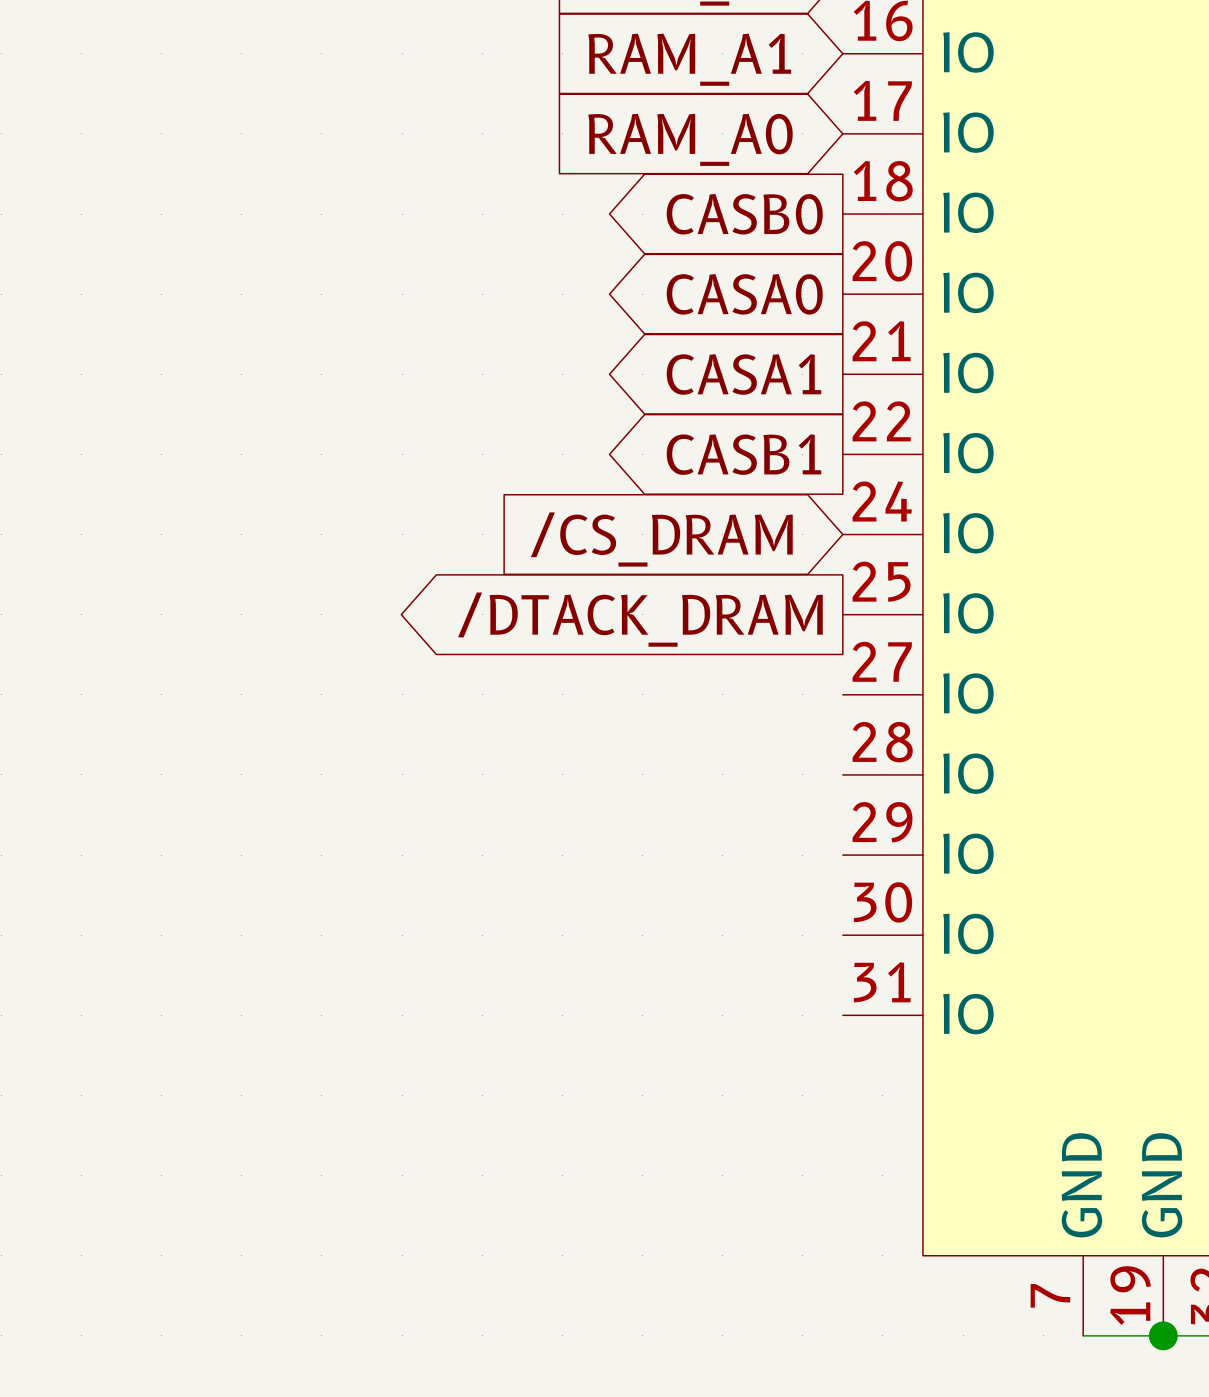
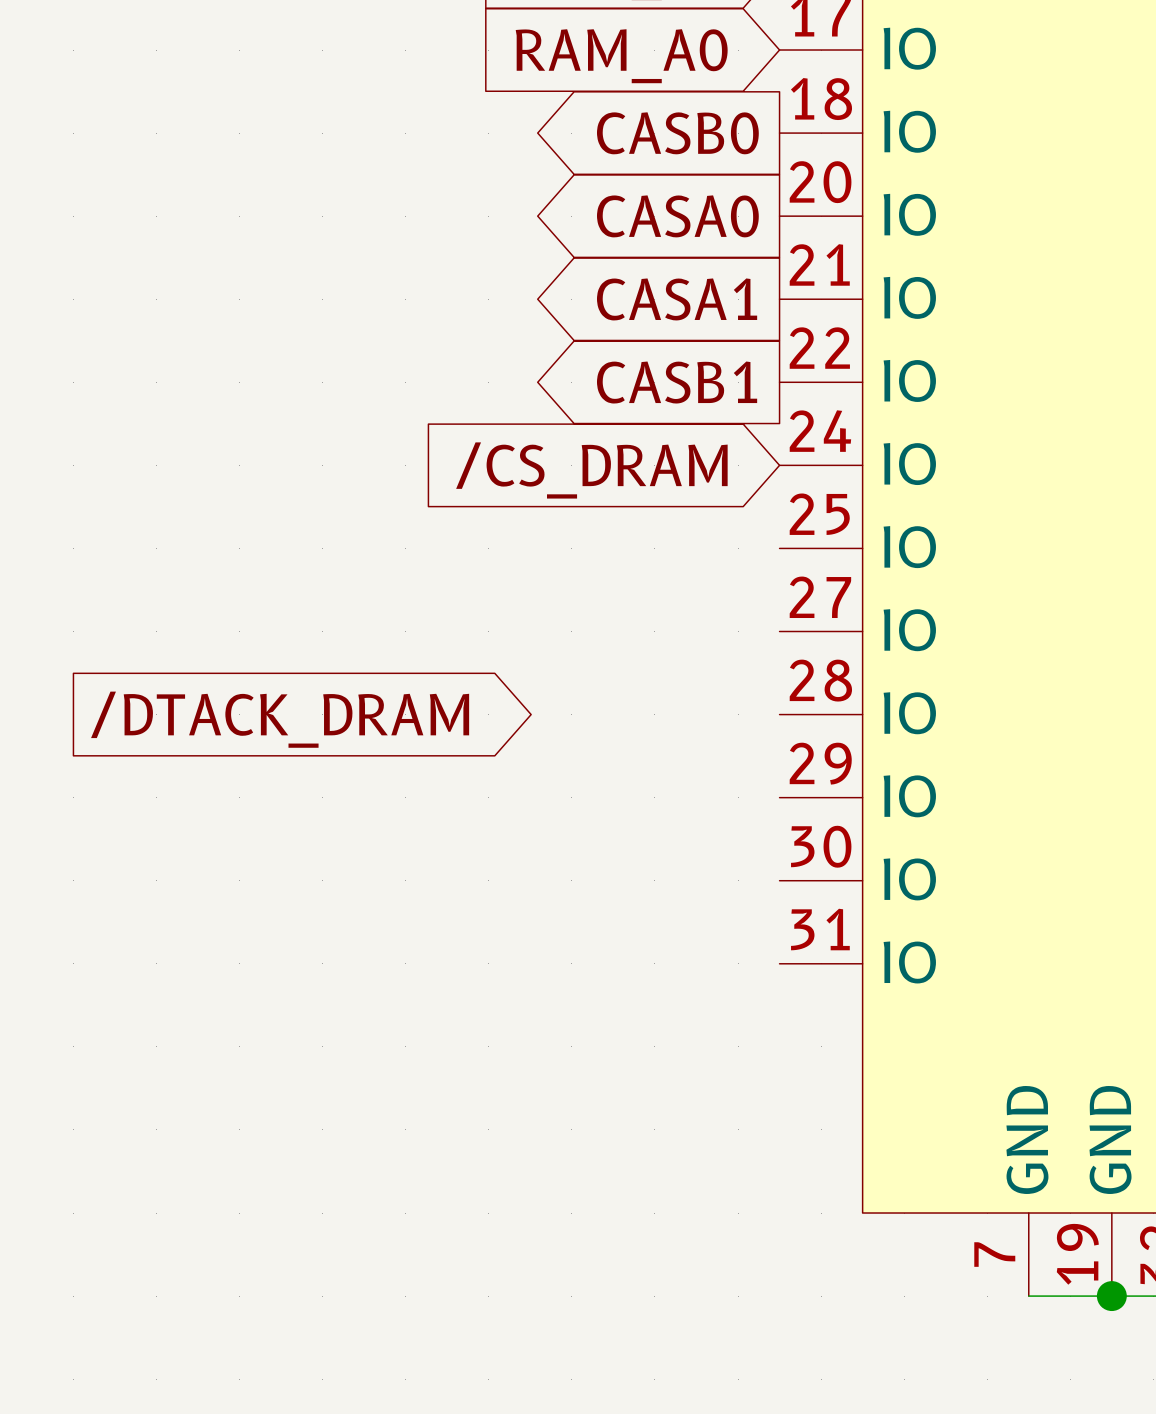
global label rotation: 0° (640, 619) -> 180° (280, 719)

